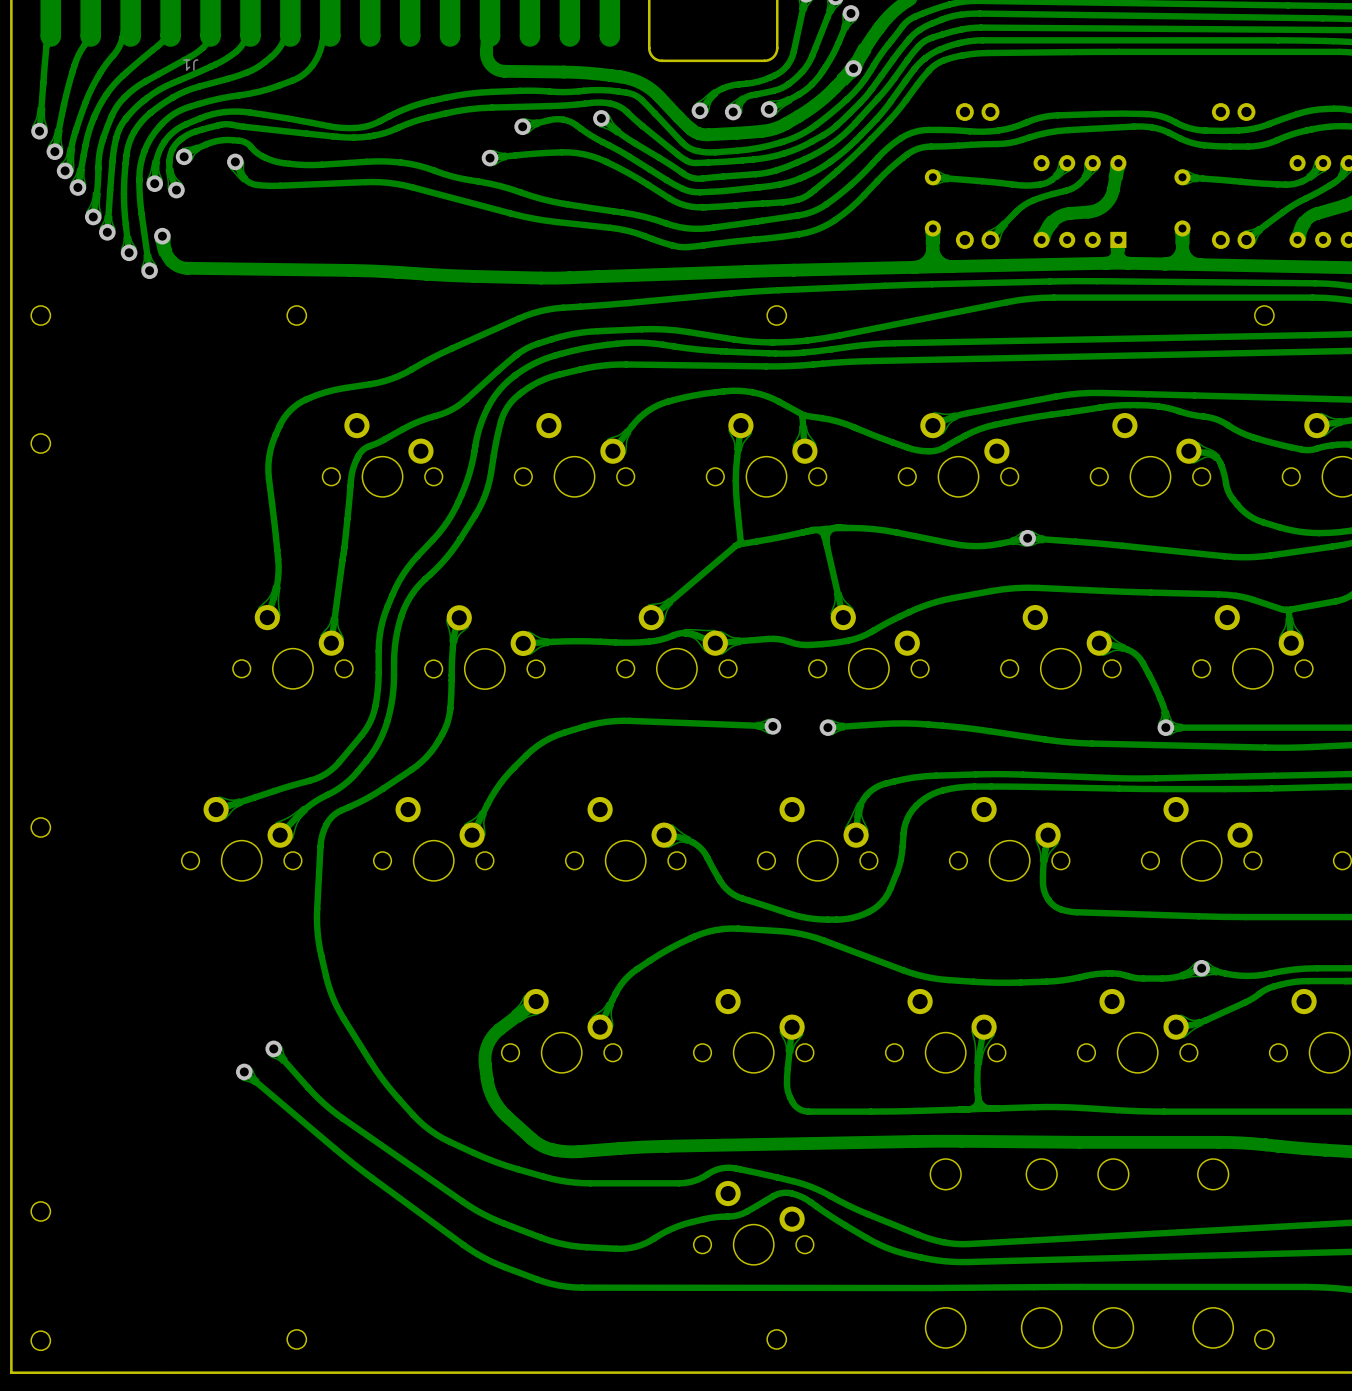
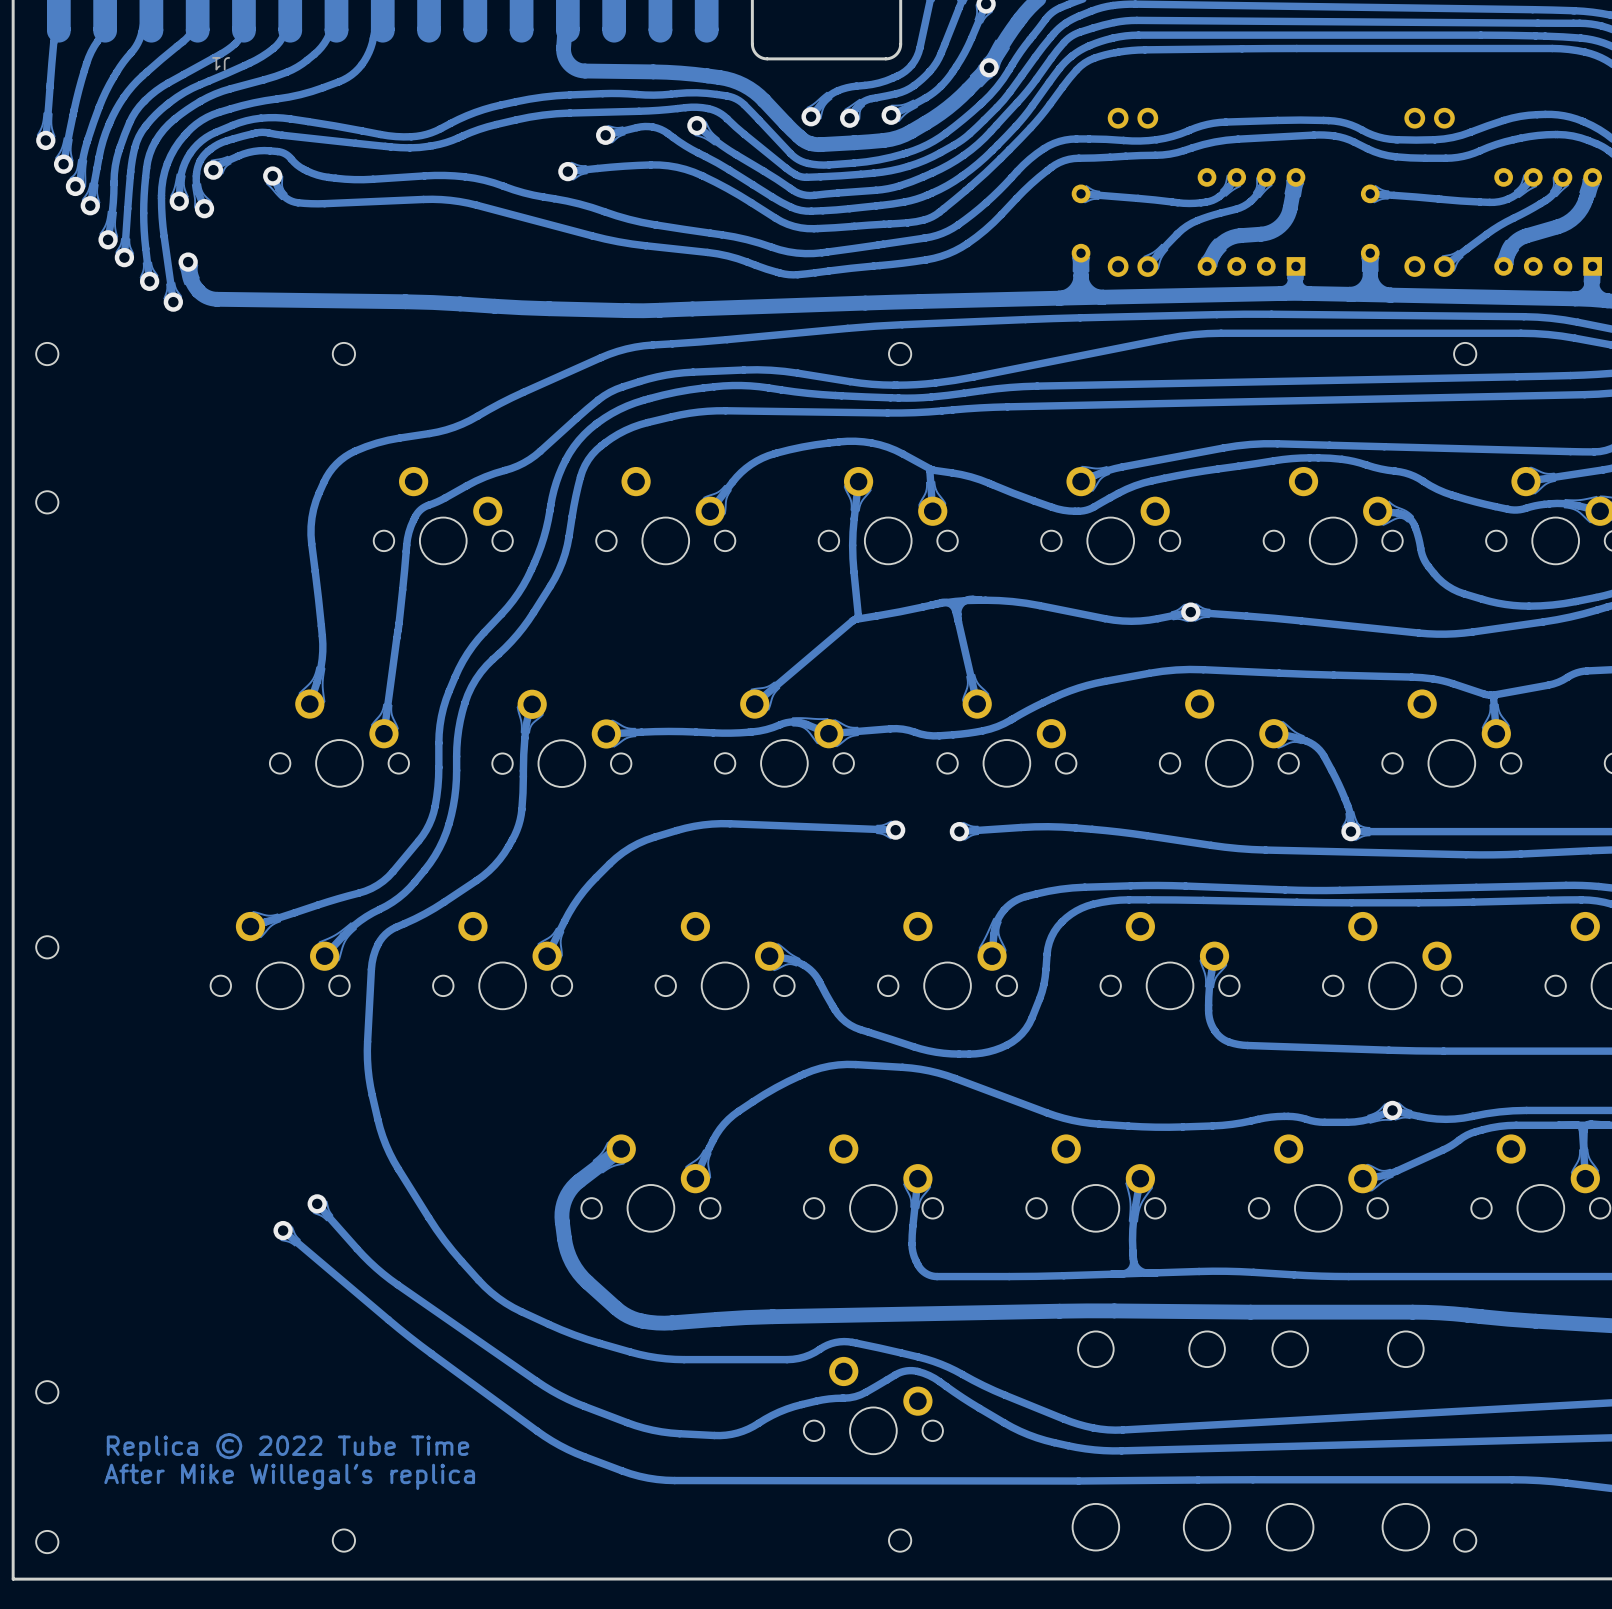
text: none -> Replica © 2022 Tube Time (288, 1447)
text: none -> After Mike Willegal's replica (289, 1476)

